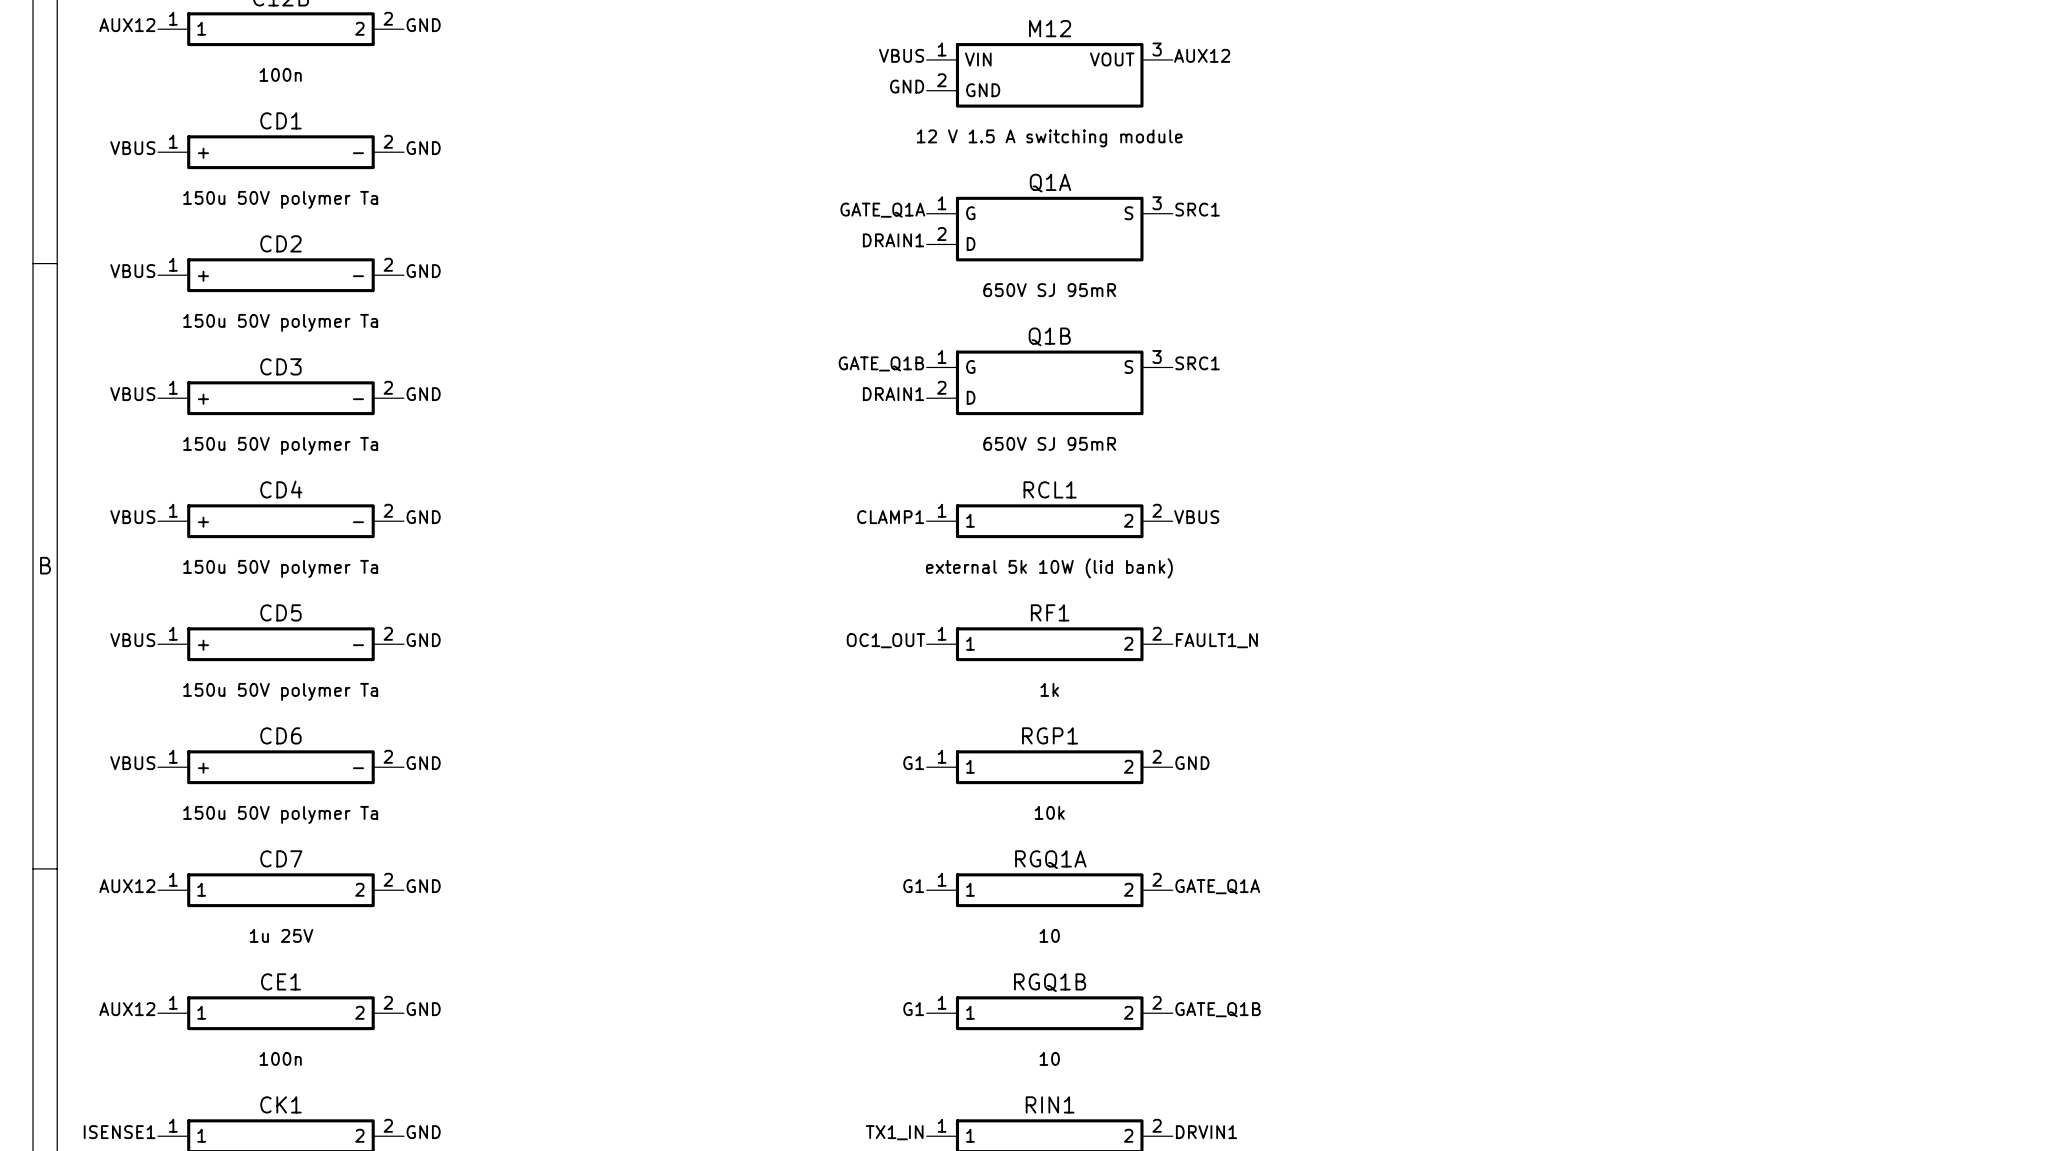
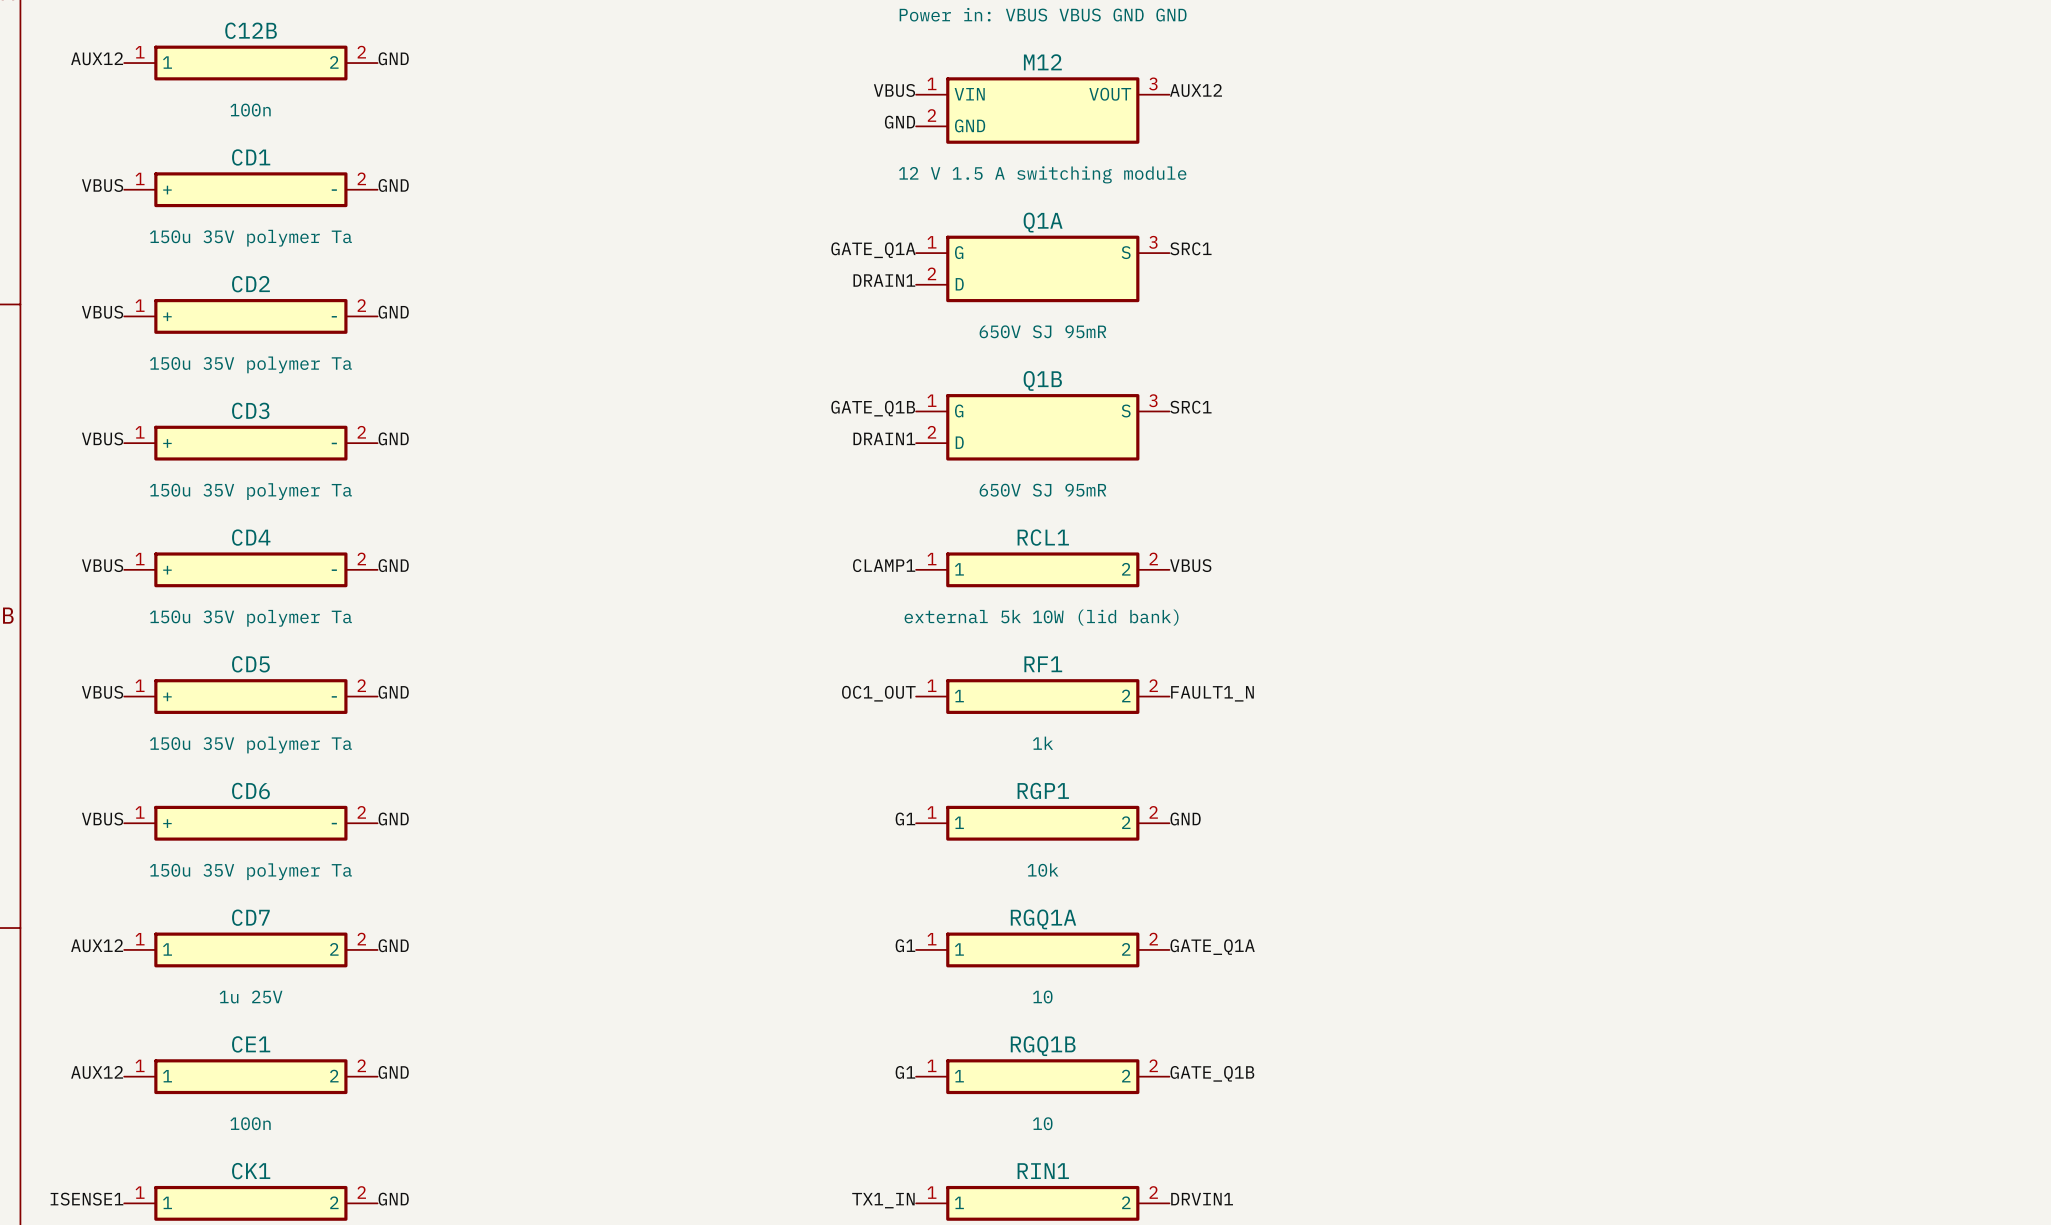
CD1 value: 150u 50V polymer Ta (280, 199) -> 150u 35V polymer Ta (250, 238)
CD2 value: 150u 50V polymer Ta (280, 322) -> 150u 35V polymer Ta (250, 364)
CD3 value: 150u 50V polymer Ta (280, 445) -> 150u 35V polymer Ta (250, 491)
CD4 value: 150u 50V polymer Ta (280, 568) -> 150u 35V polymer Ta (250, 618)
CD5 value: 150u 50V polymer Ta (280, 691) -> 150u 35V polymer Ta (250, 745)
CD6 value: 150u 50V polymer Ta (280, 814) -> 150u 35V polymer Ta (250, 871)

